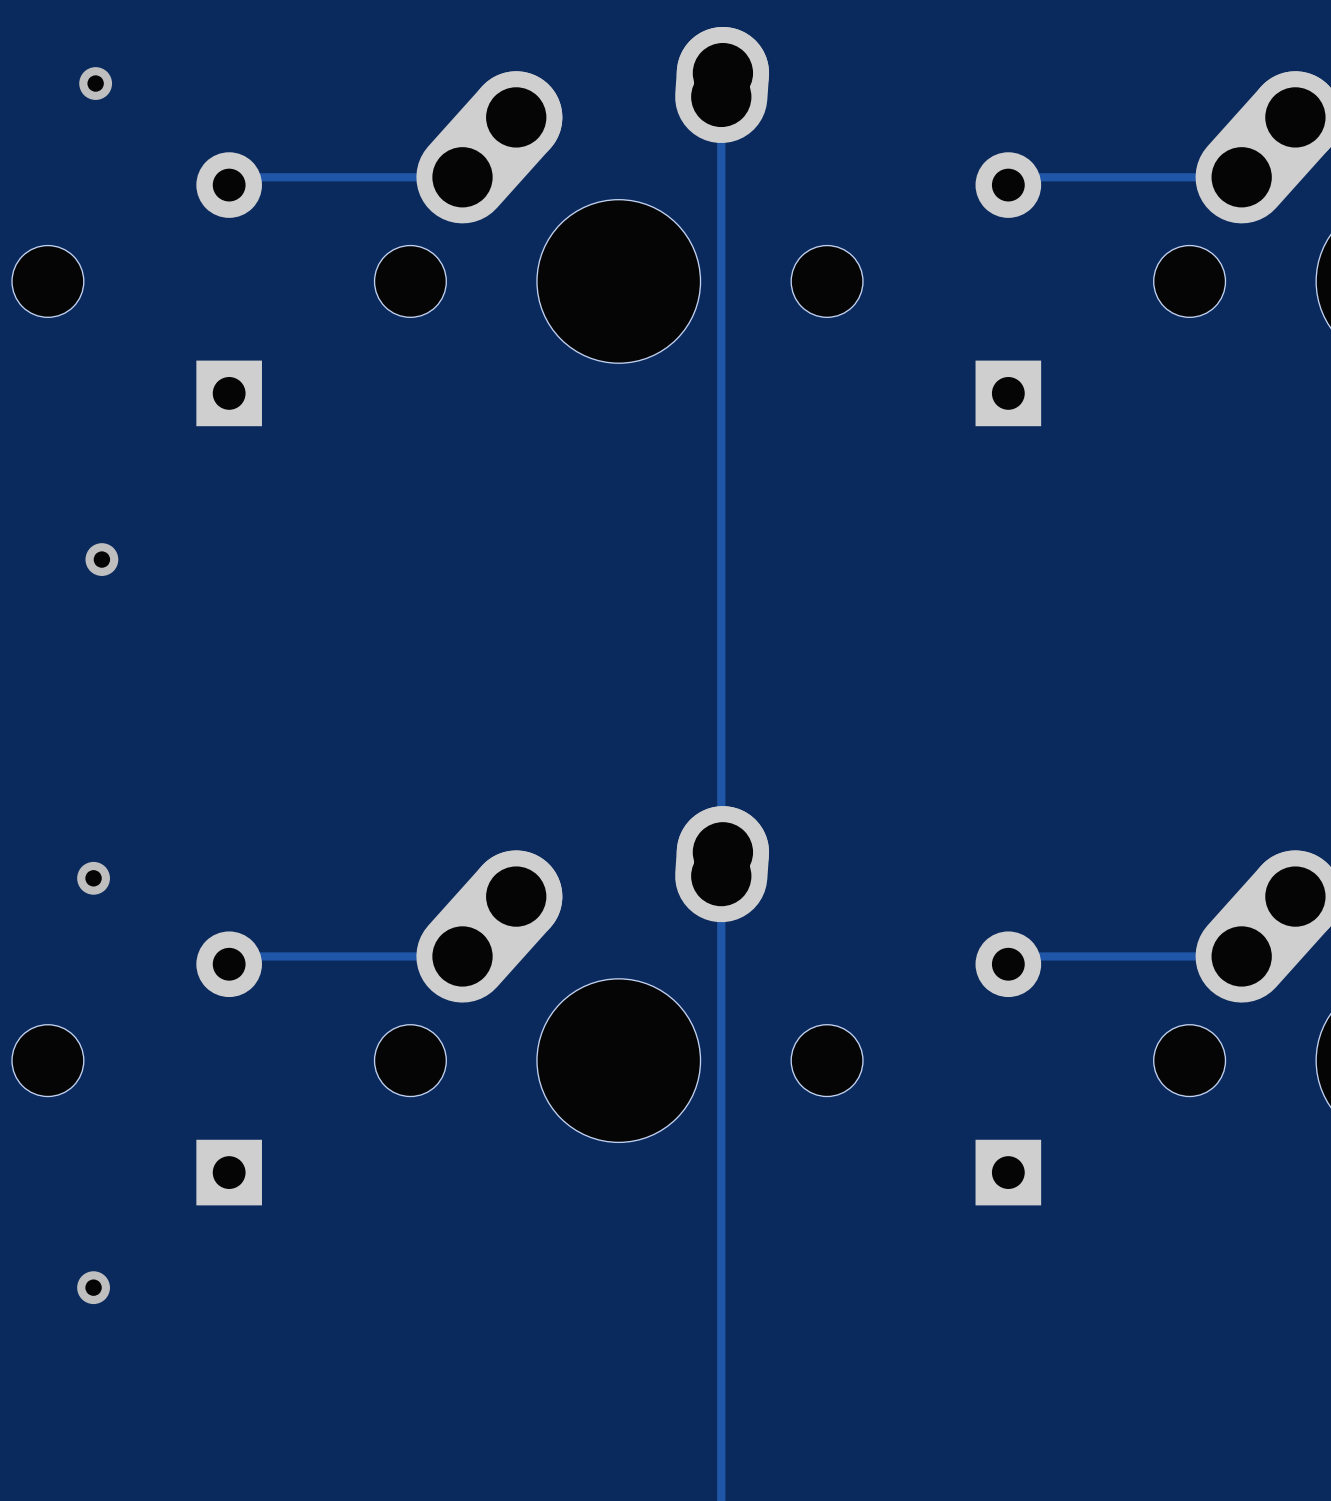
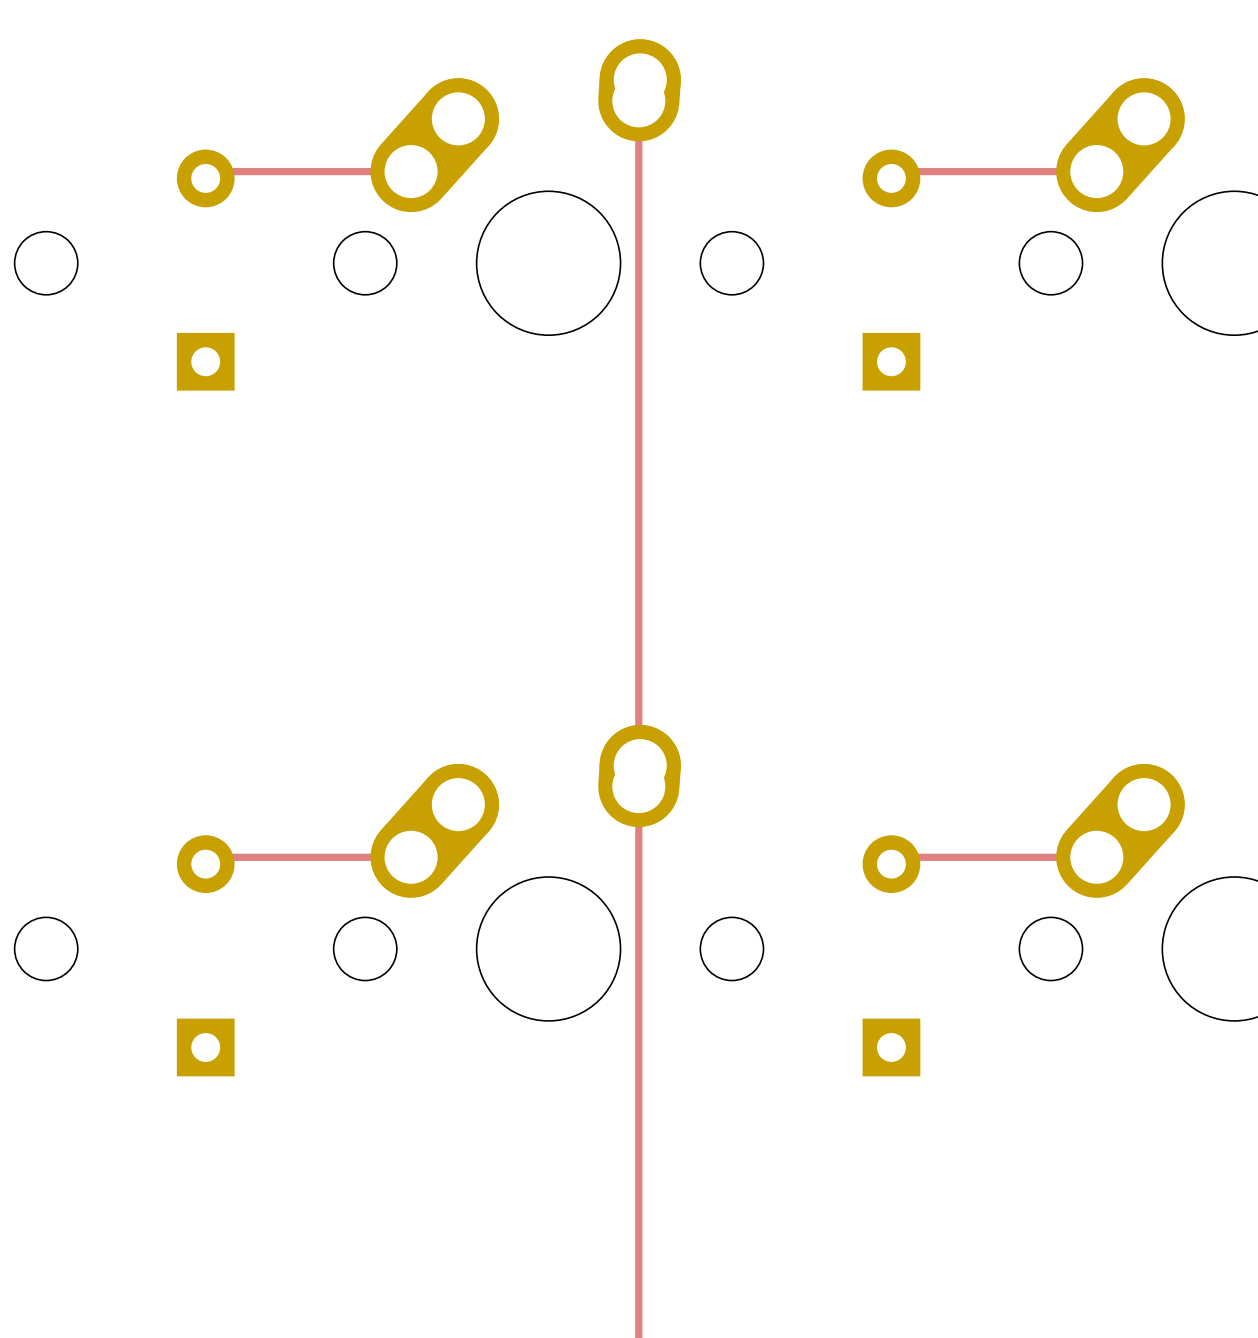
via: (95, 83) -> none
via: (101, 559) -> none
via: (93, 878) -> none
via: (93, 1287) -> none

